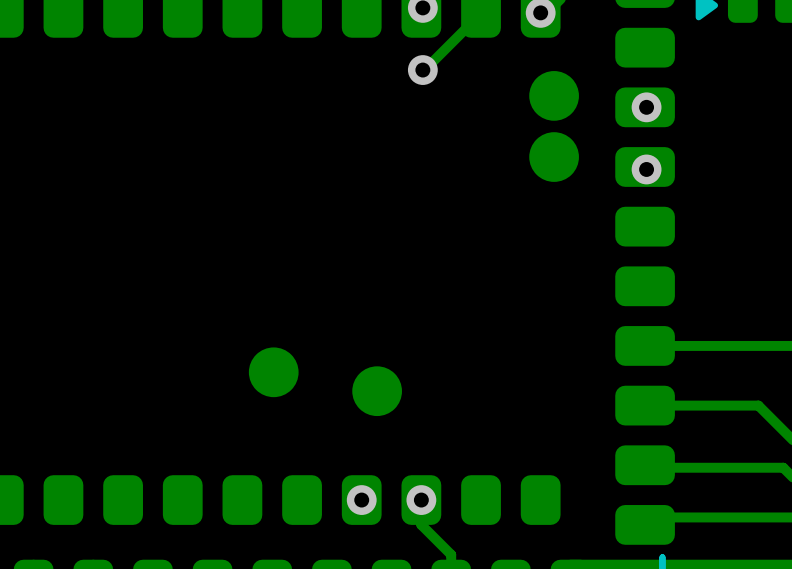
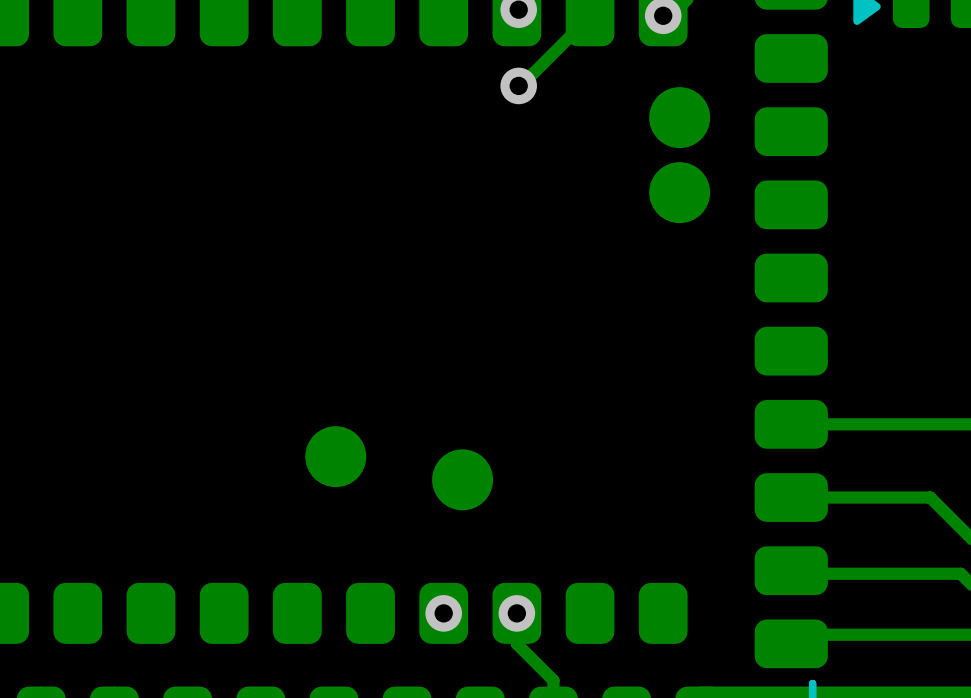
via: (646, 107) -> none
via: (646, 169) -> none

